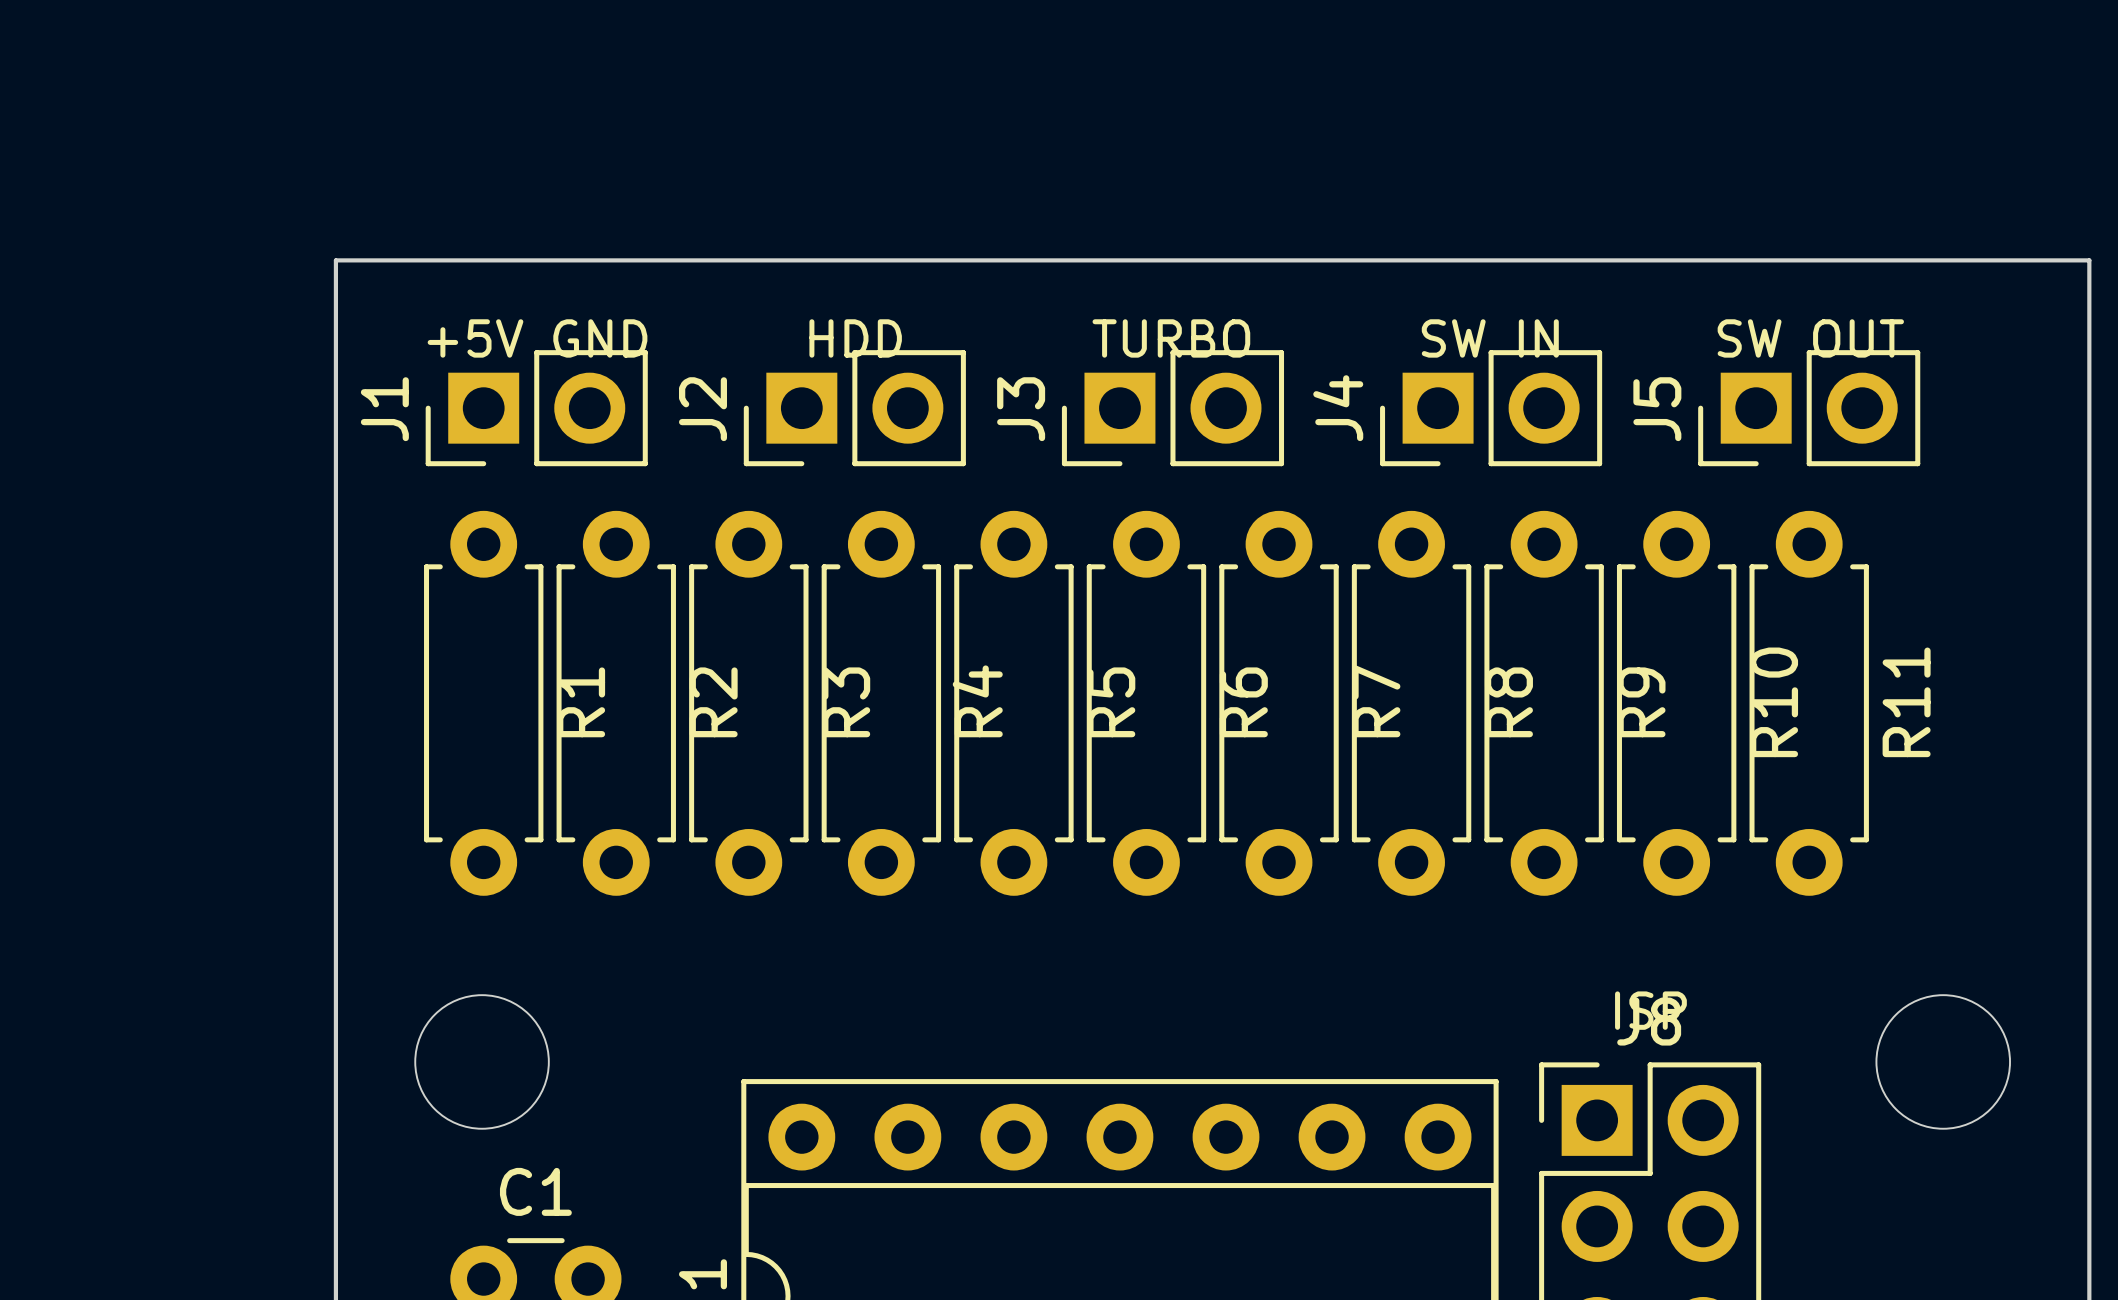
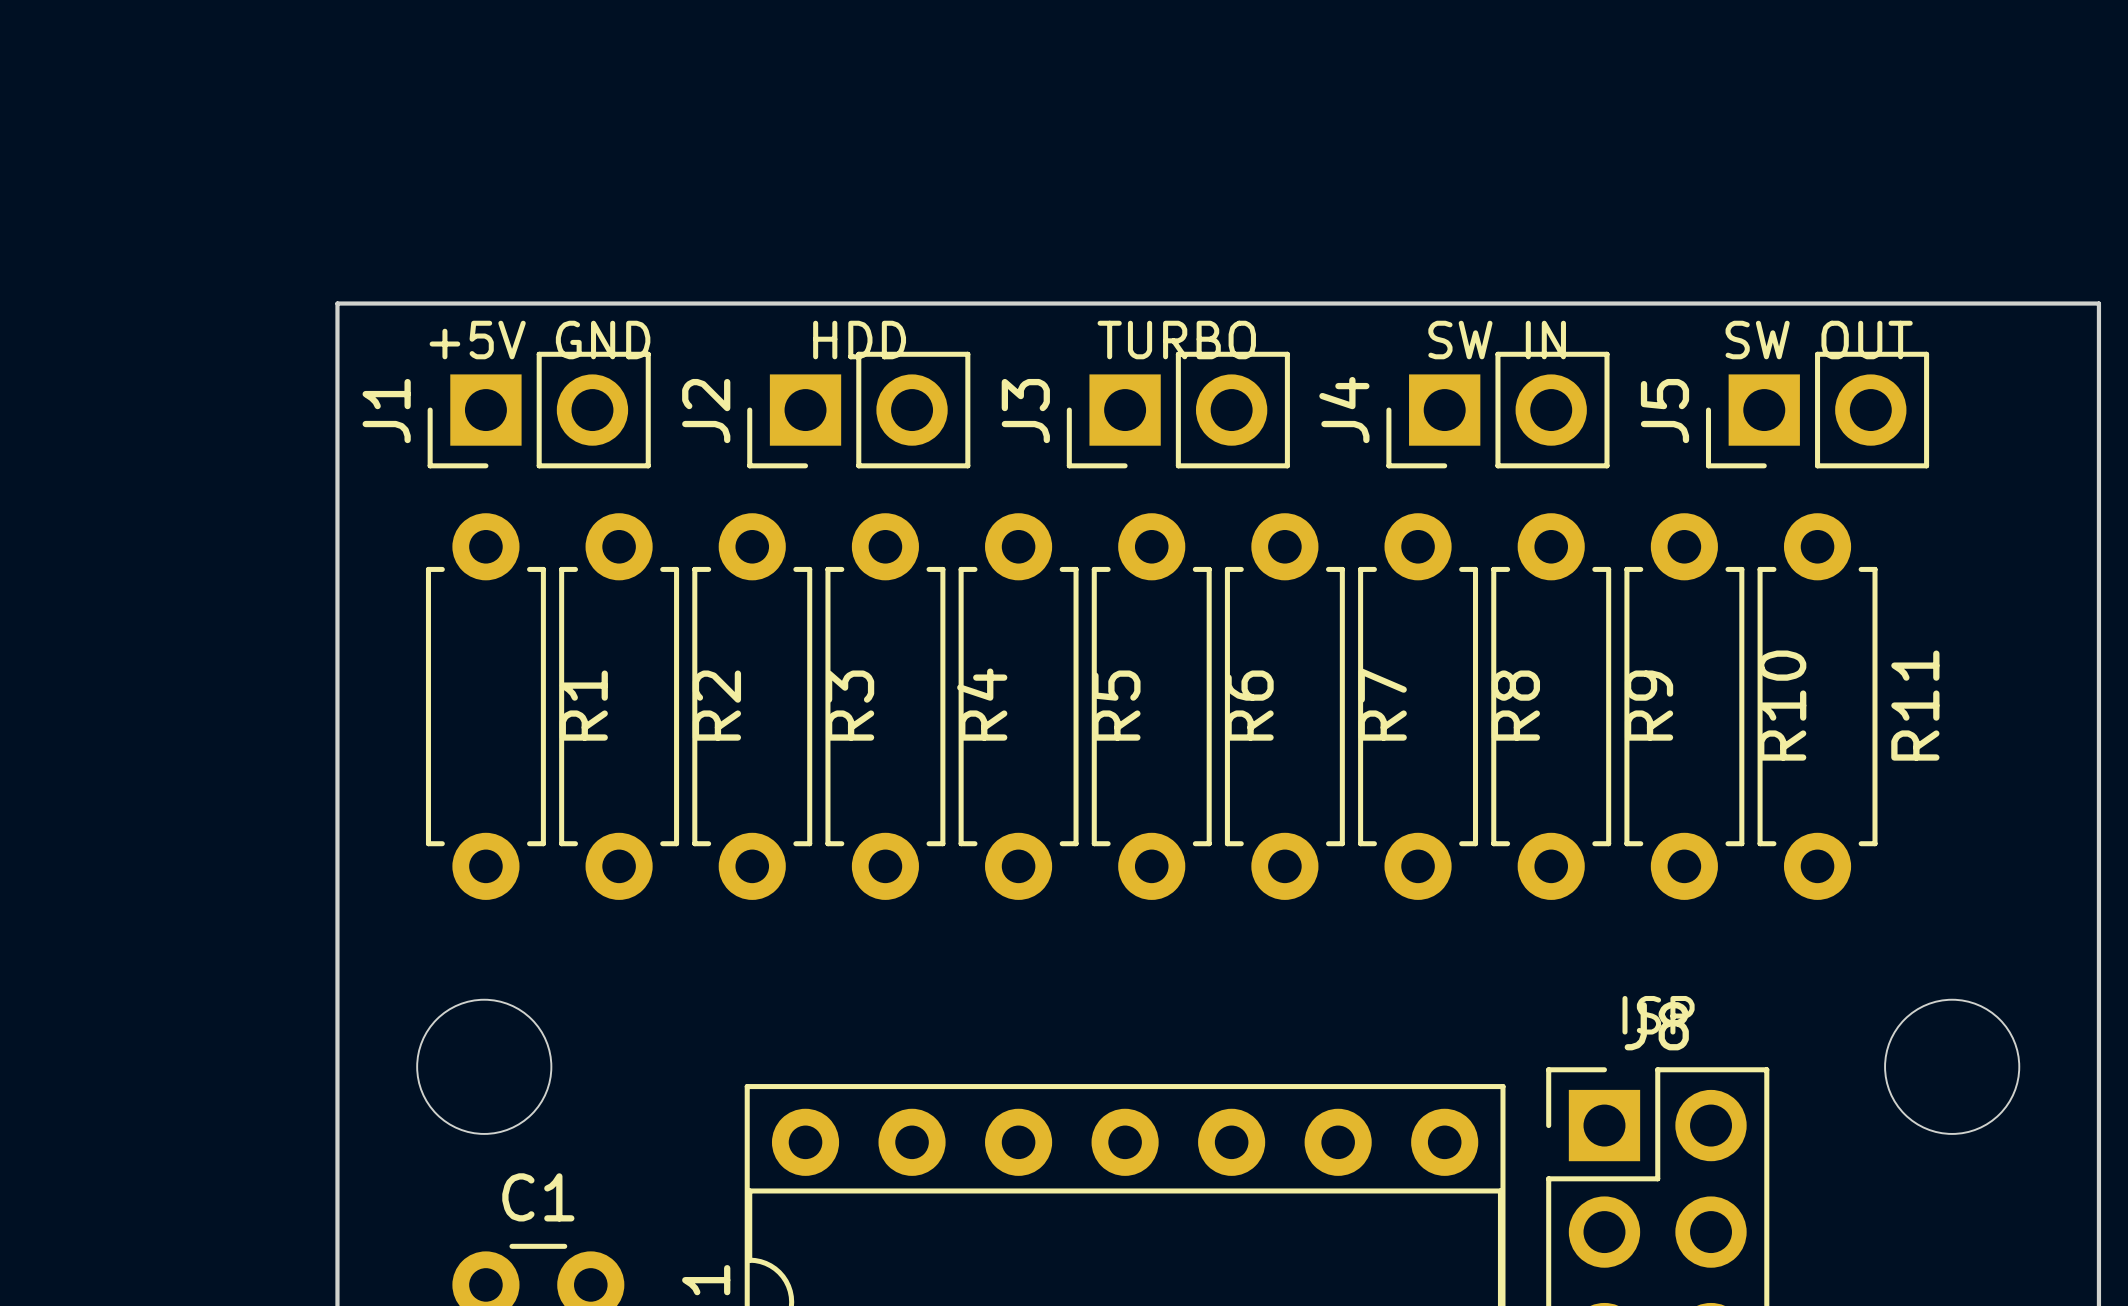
board edge: (335, 302) (335, 260) (2089, 260) (2089, 302) -> (337, 303) (2098, 303)

